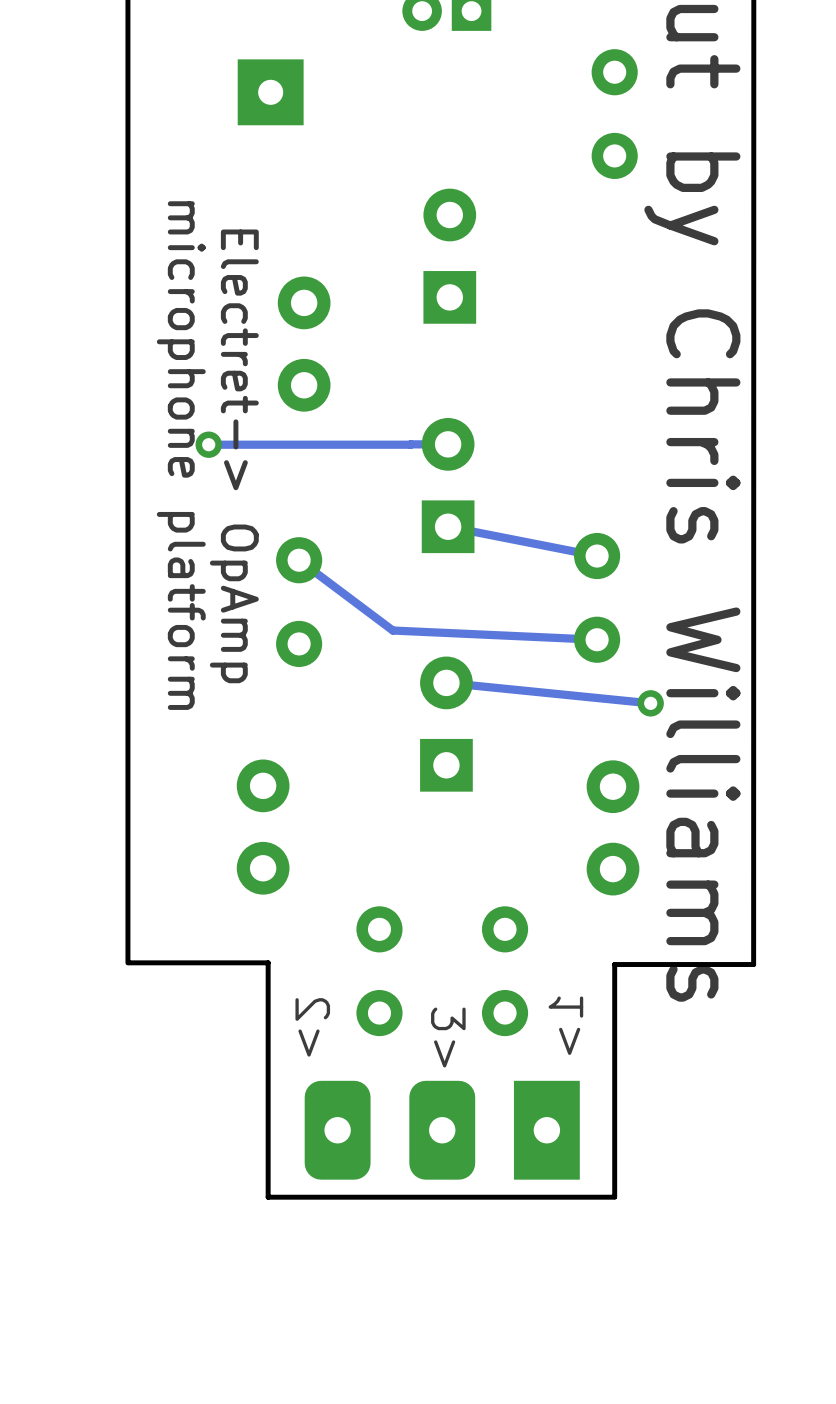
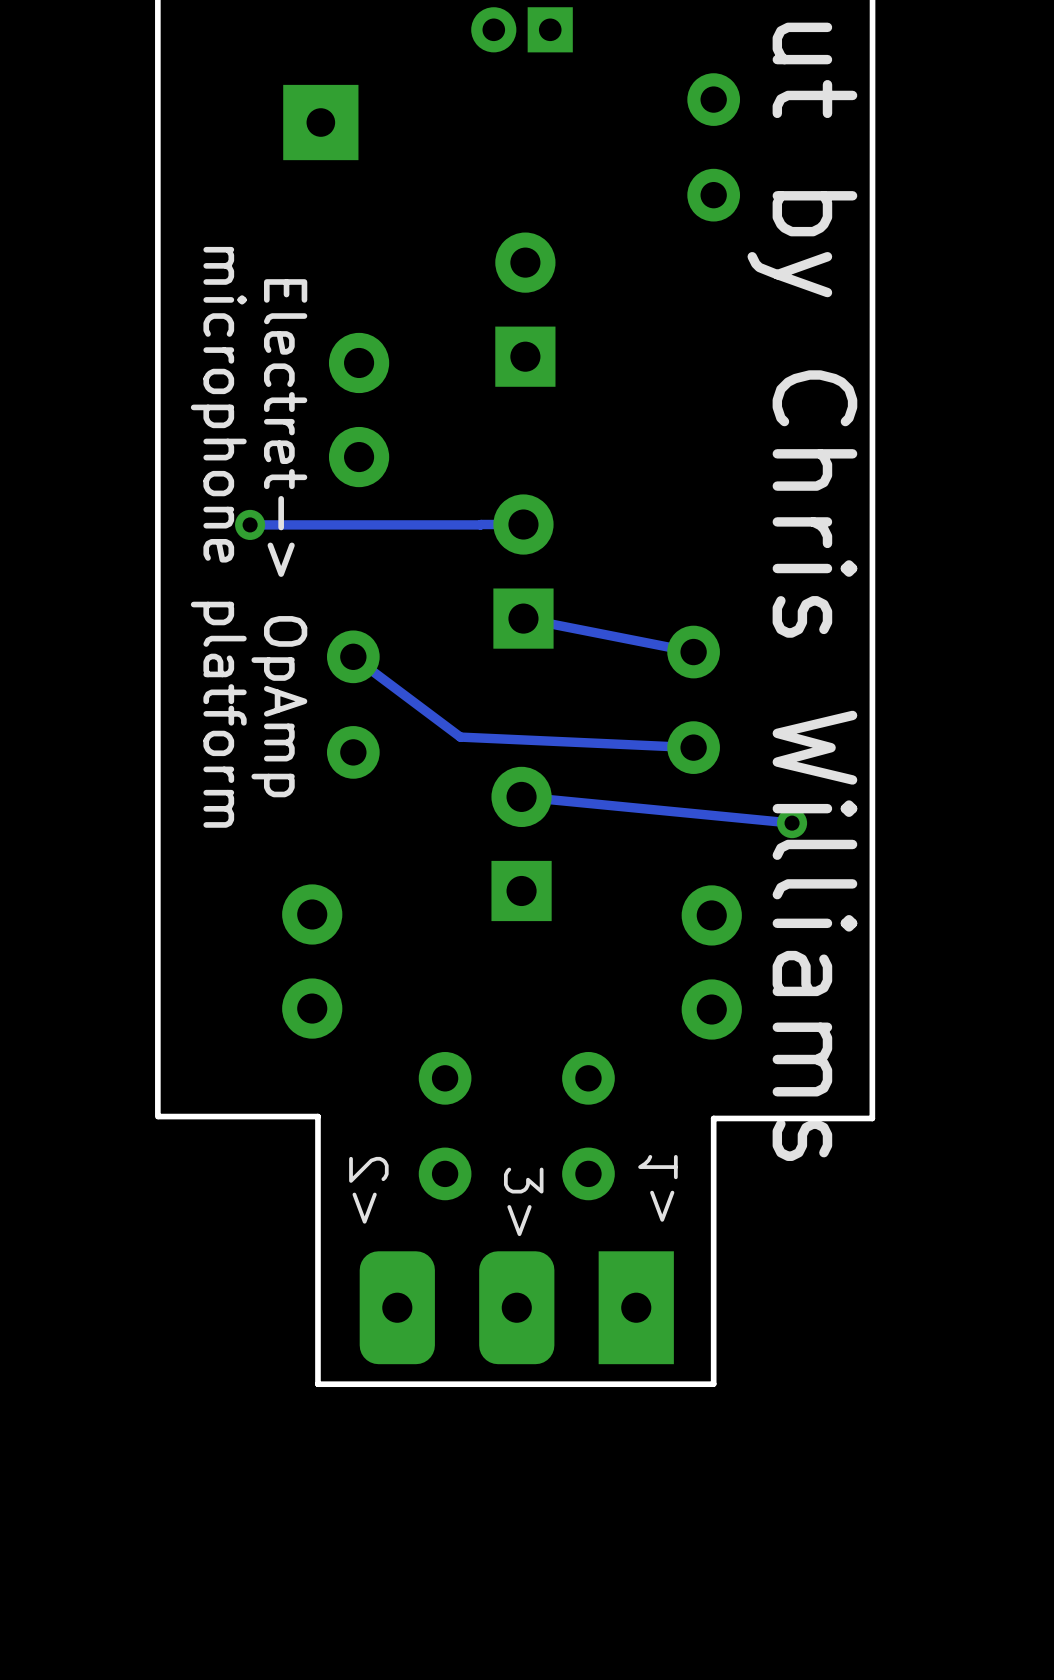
track: (446, 682) (650, 703) -> (521, 796) (792, 823)
via position: (650, 703) -> (792, 823)

